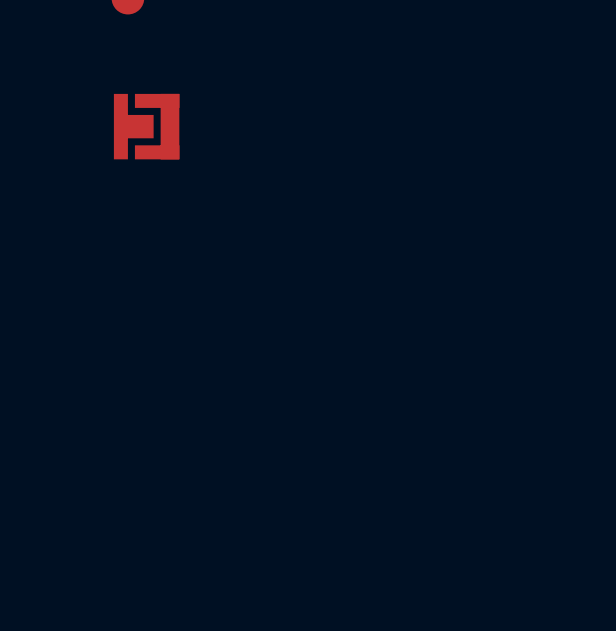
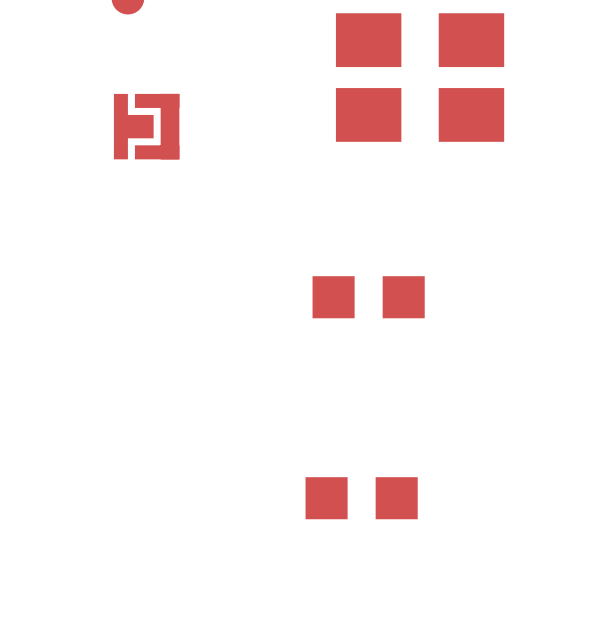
part: none -> (420, 77)
part: none -> (368, 297)
part: none -> (361, 498)

